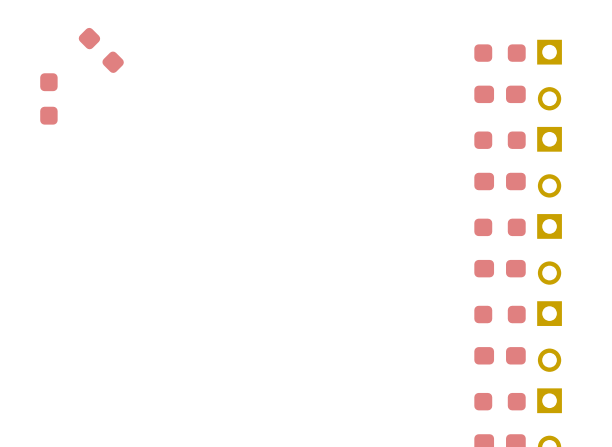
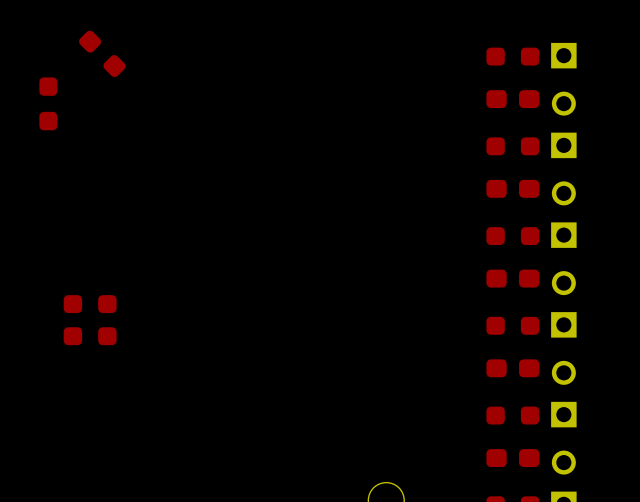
part: none -> (90, 304)
part: none -> (90, 336)

